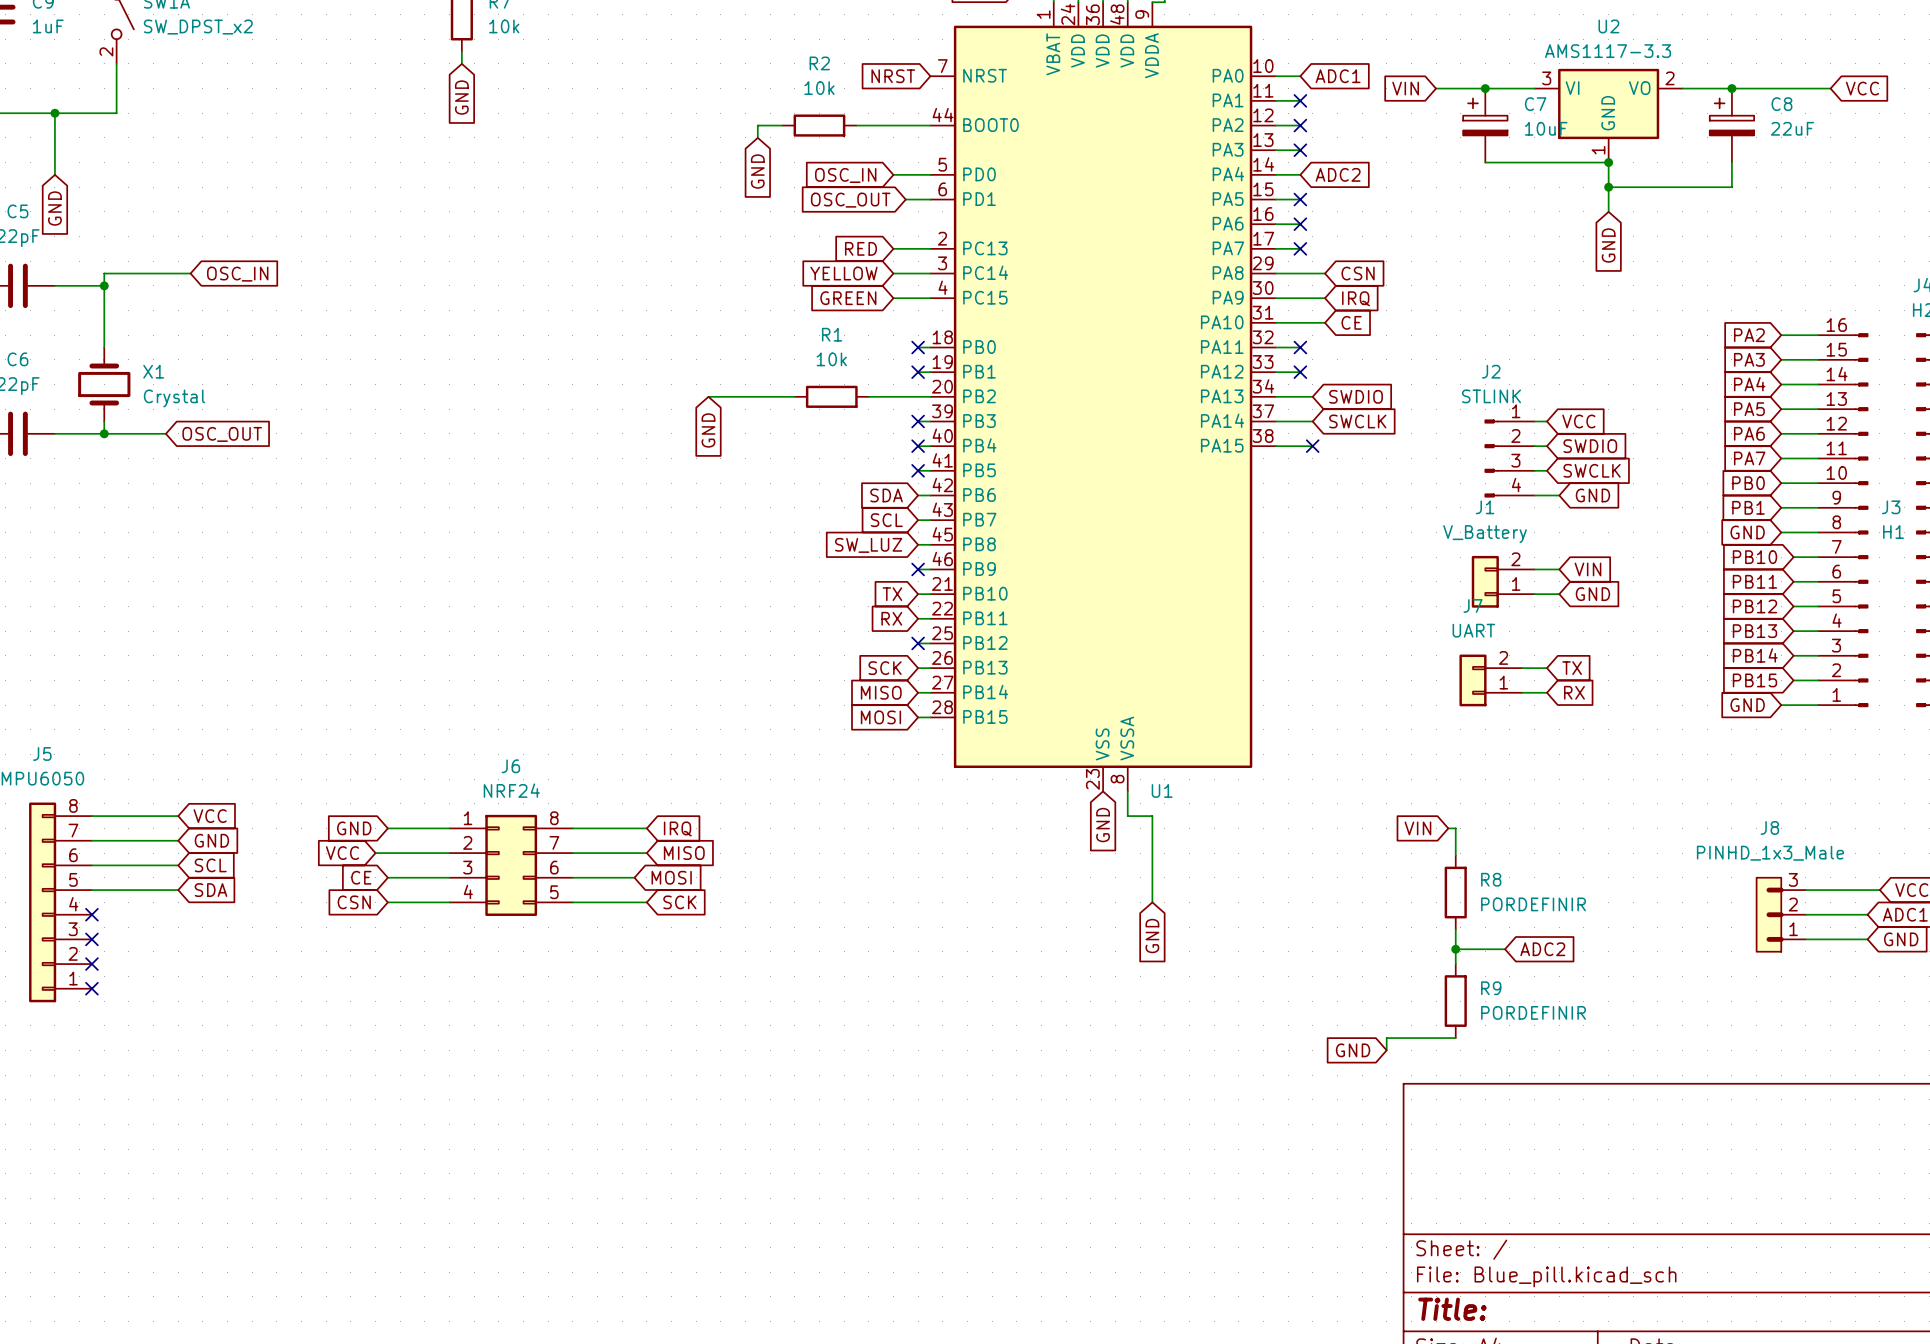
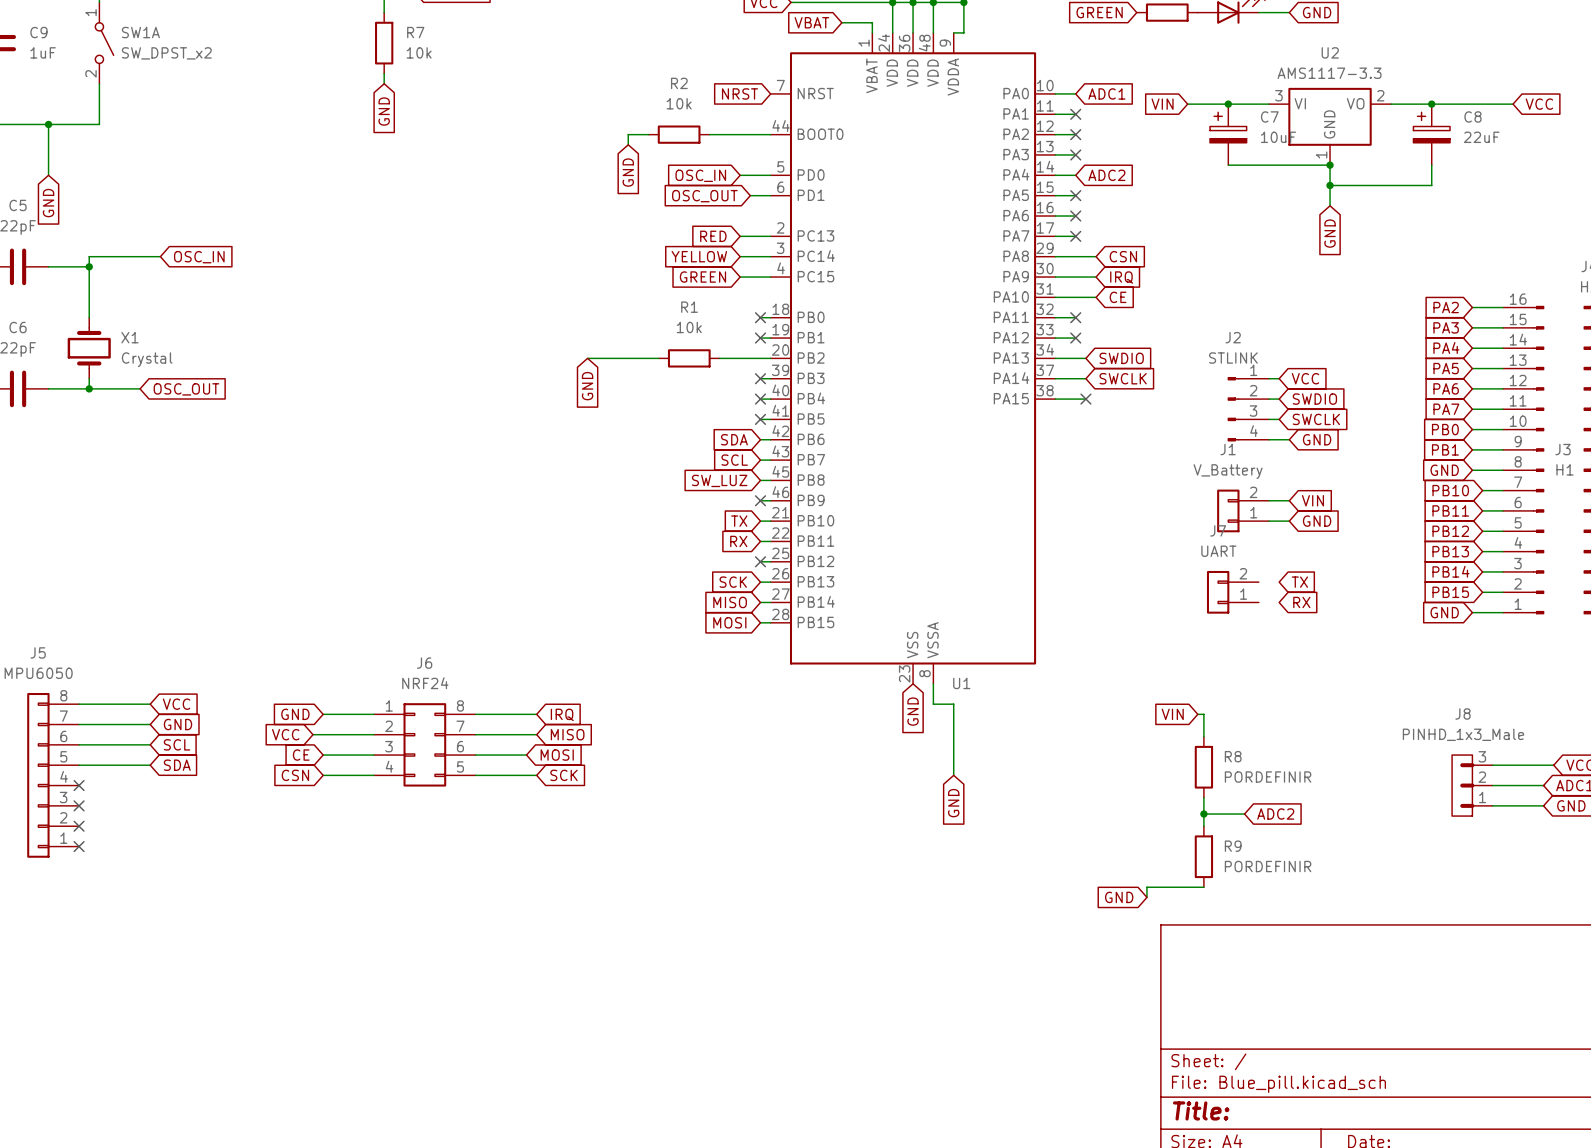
wire: (1522, 668) (1546, 668) -> none
wire: (1522, 692) (1546, 692) -> none

